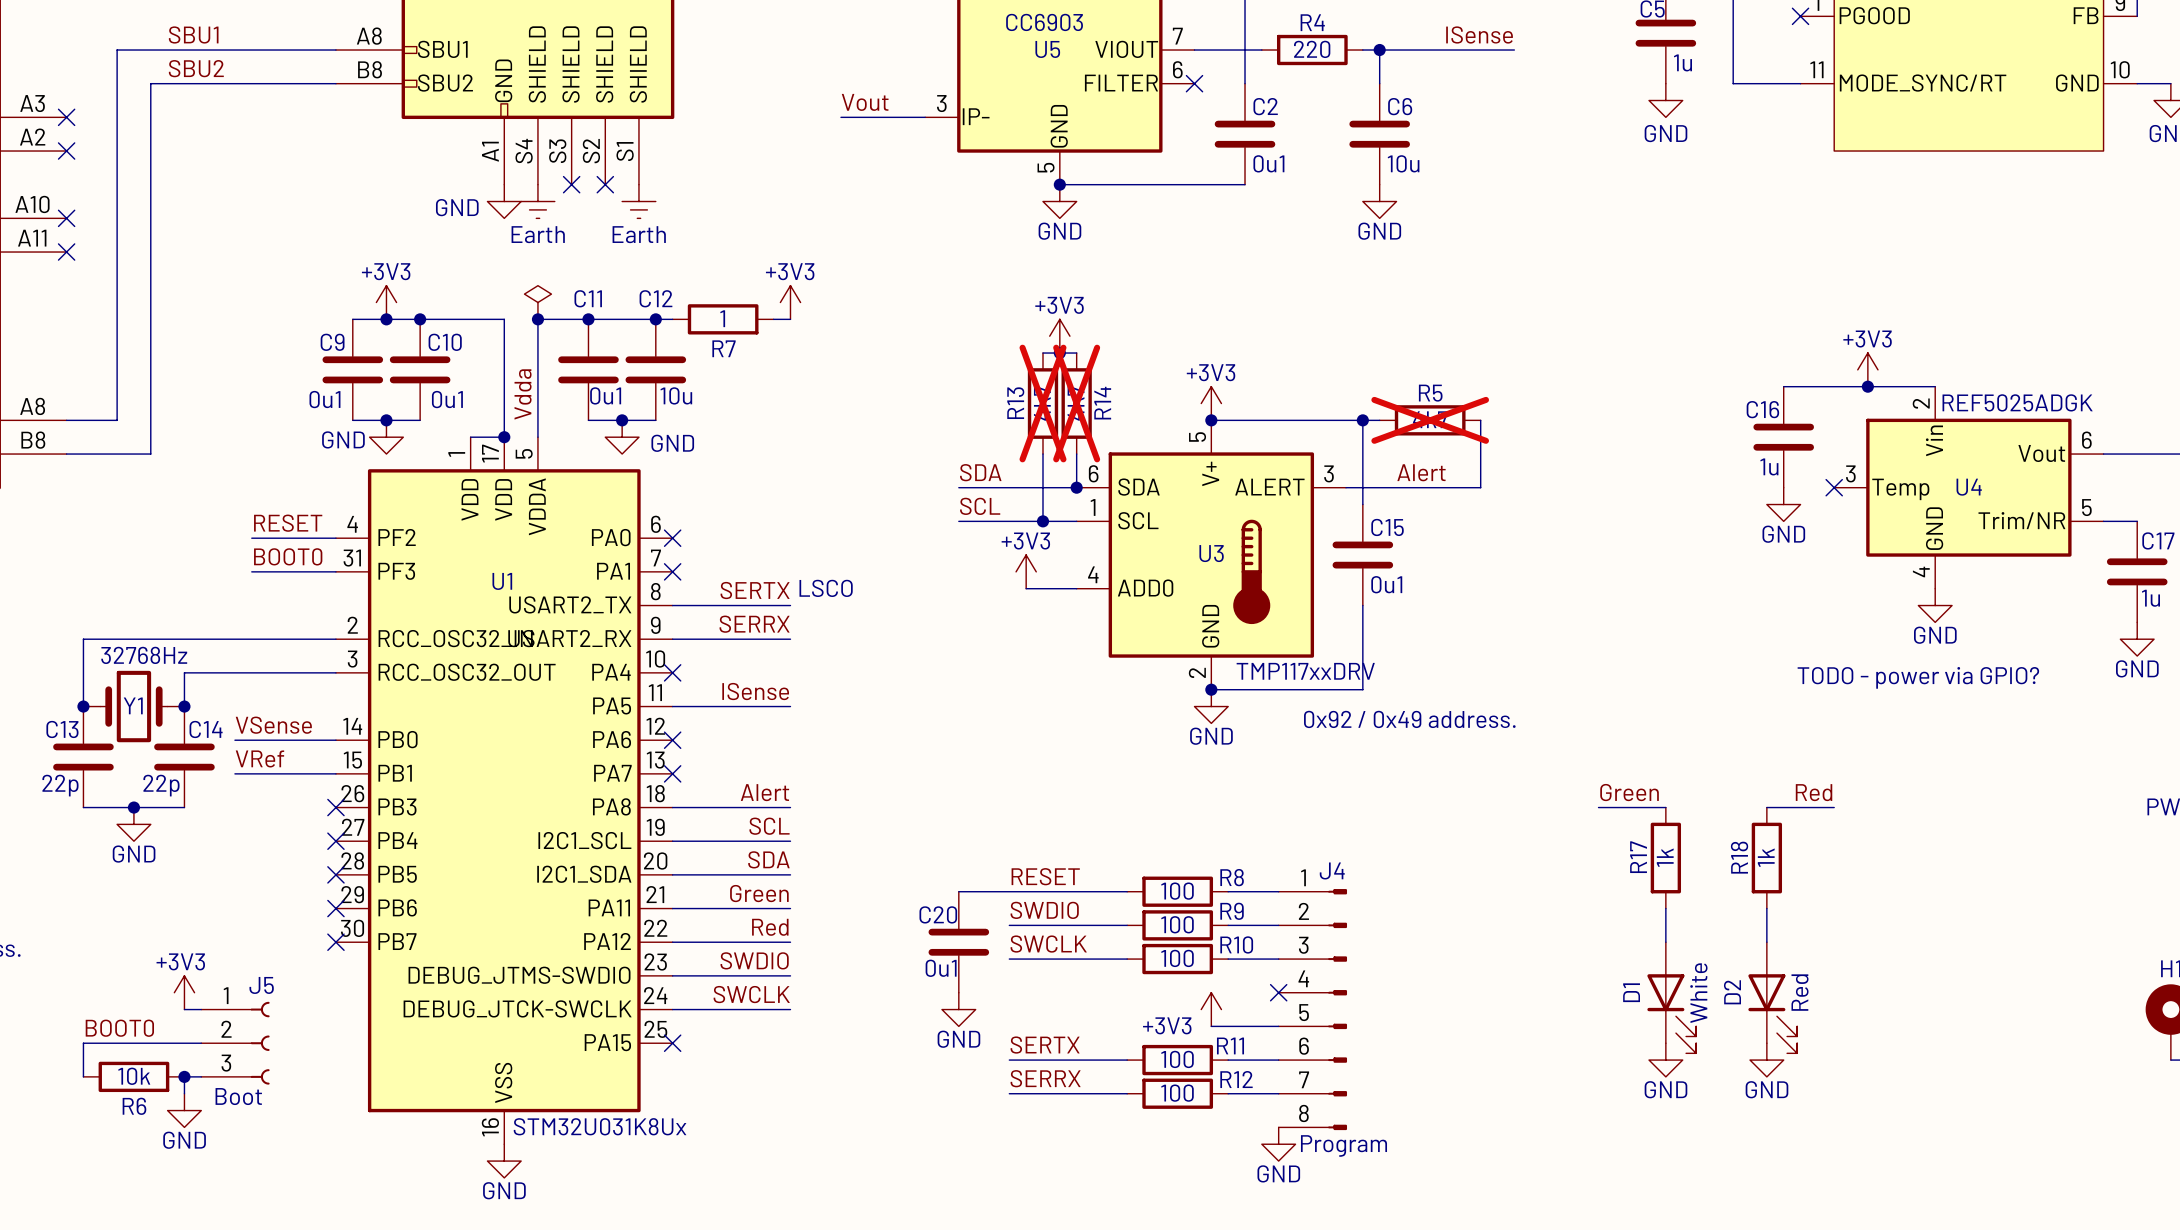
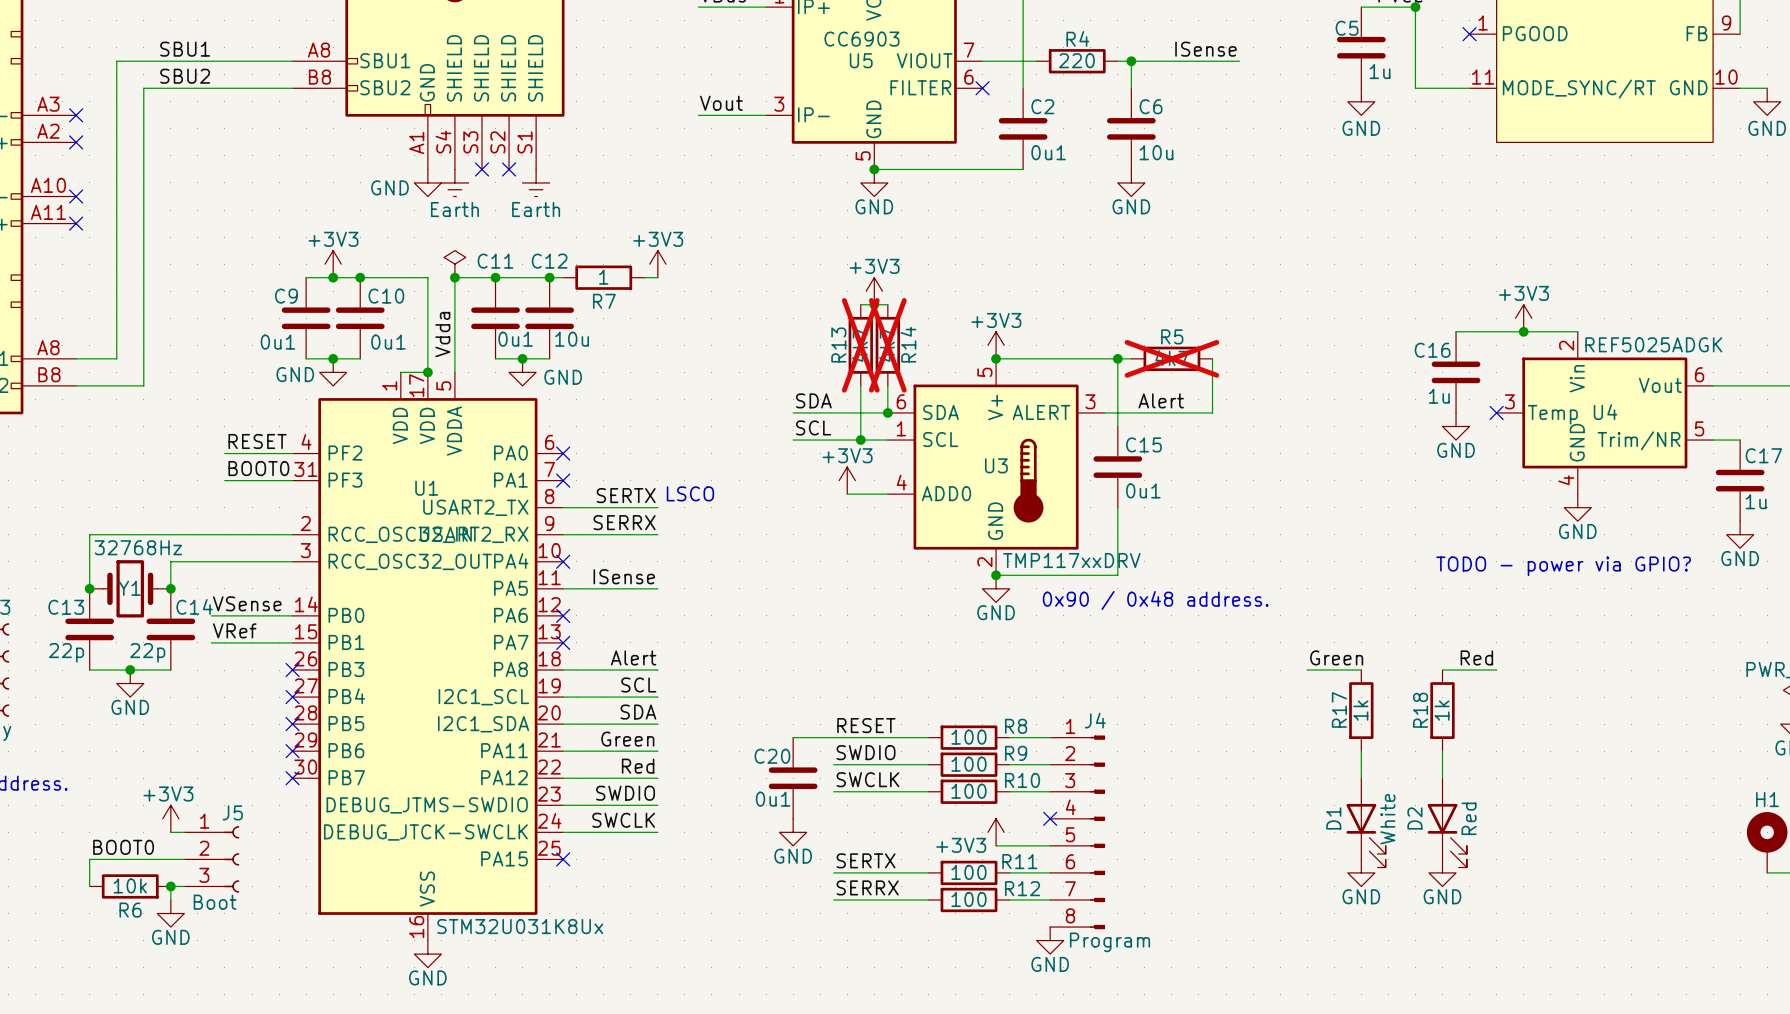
text: 0x92 / 0x49 address. (1409, 719) -> 0x90 / 0x48 address. (1155, 600)

